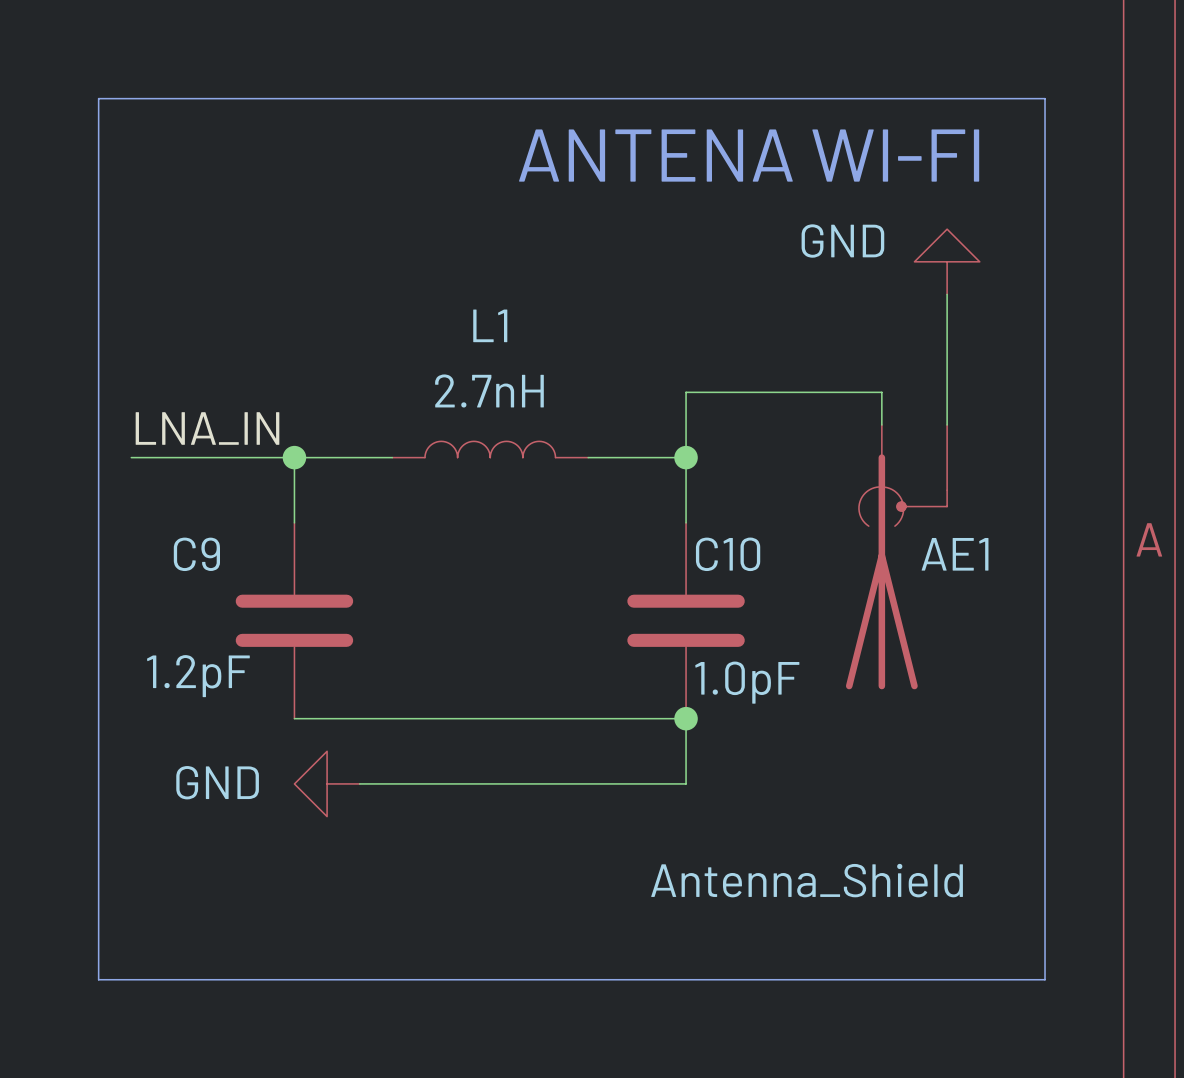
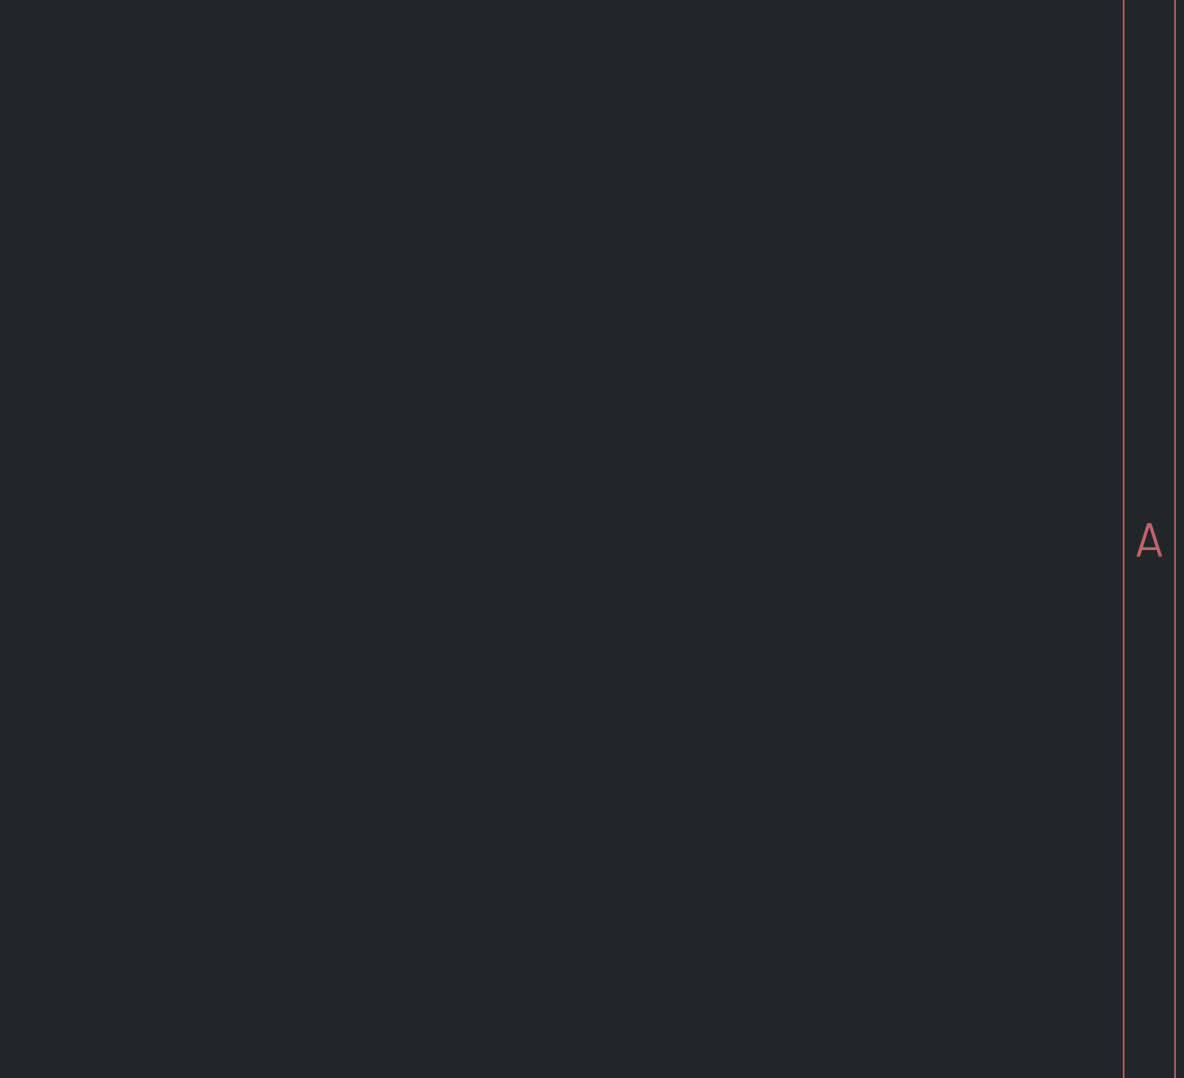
line: (98, 98) (98, 979) (1045, 979) (1045, 98) (98, 98) -> none
text: ANTENA WI-FI (749, 155) -> none
power symbol: GND (947, 261) -> none
wire: (947, 294) (947, 424) -> none
wire: (881, 424) (881, 392) (686, 392) (686, 522) -> none
label: LNA_IN (207, 428) -> none
L1: 2.7nH (490, 449) -> none
wire: (131, 457) (392, 457) -> none
wire: (294, 457) (294, 522) -> none
junction: (294, 457) -> none
wire: (588, 457) (686, 457) -> none
junction: (686, 457) -> none
AE1: Antenna_Shield (896, 557) -> none
C9: 1.2pF (294, 620) -> none
C10: 1.0pF (686, 620) -> none
wire: (294, 718) (686, 718) (686, 783) (359, 783) -> none
junction: (686, 718) -> none
power symbol: GND (327, 783) -> none

